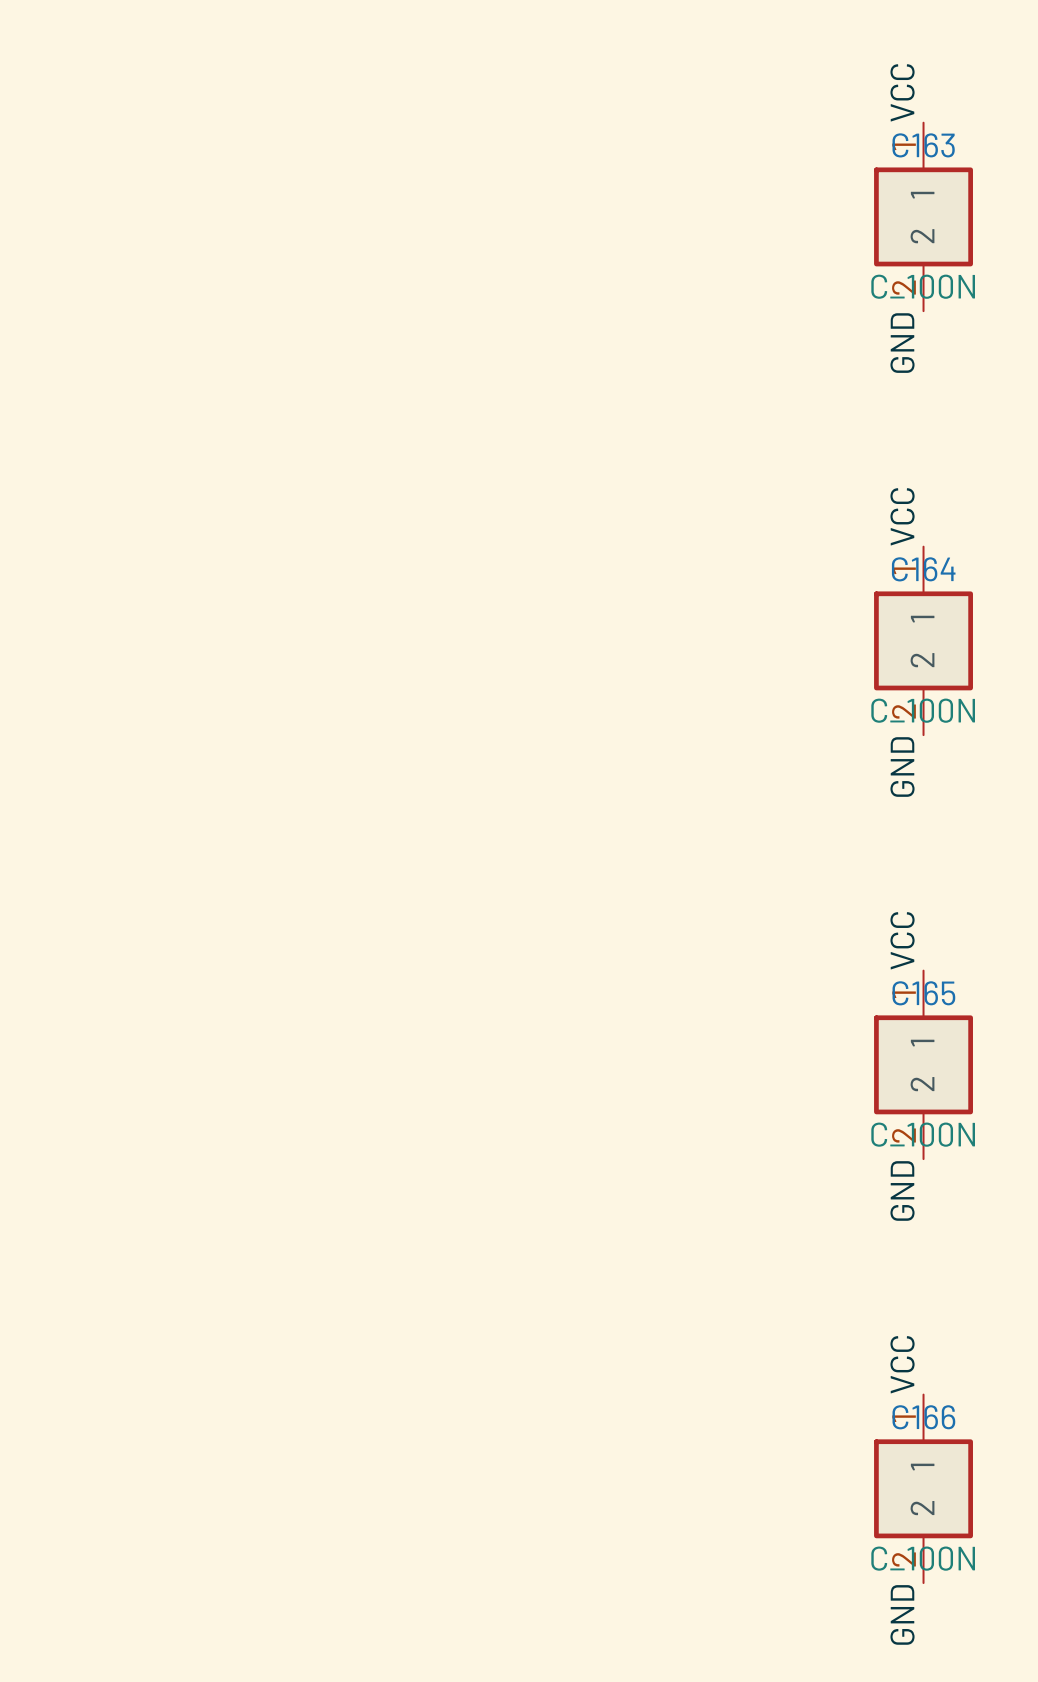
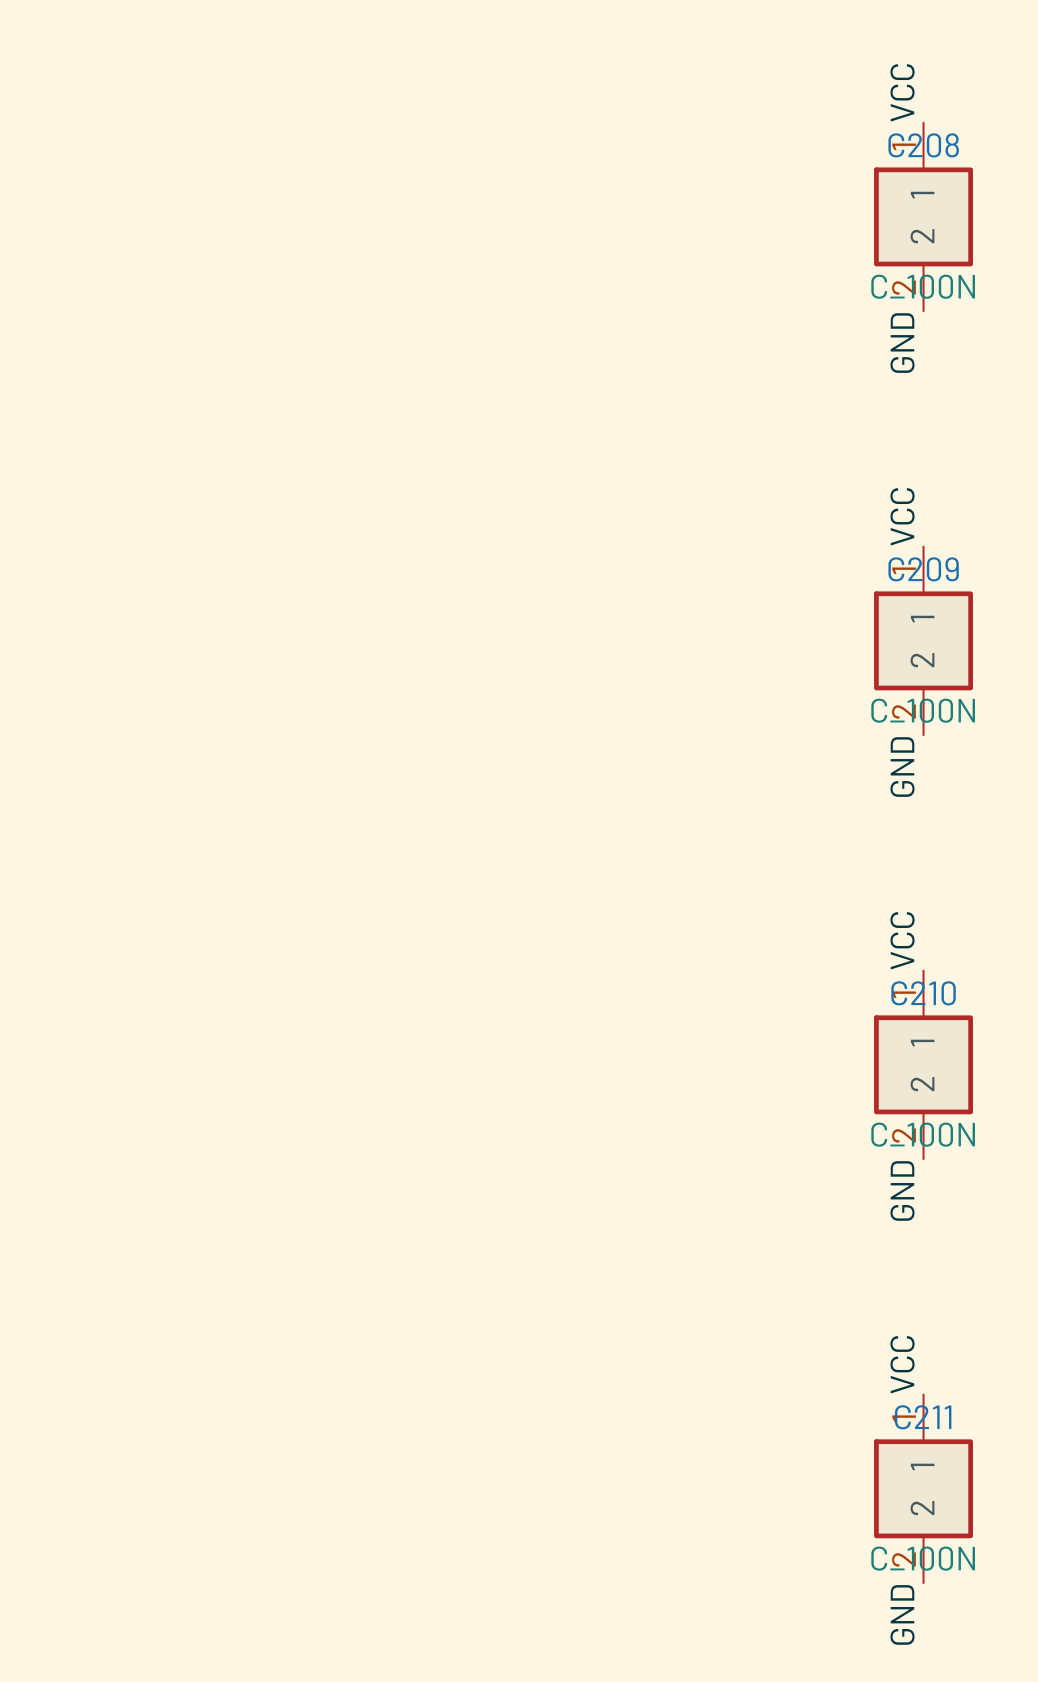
C163 name: C163 (923, 145) -> C208 (923, 145)
C164 name: C164 (923, 569) -> C209 (923, 569)
C165 name: C165 (923, 993) -> C210 (923, 993)
C166 name: C166 (923, 1417) -> C211 (923, 1417)

